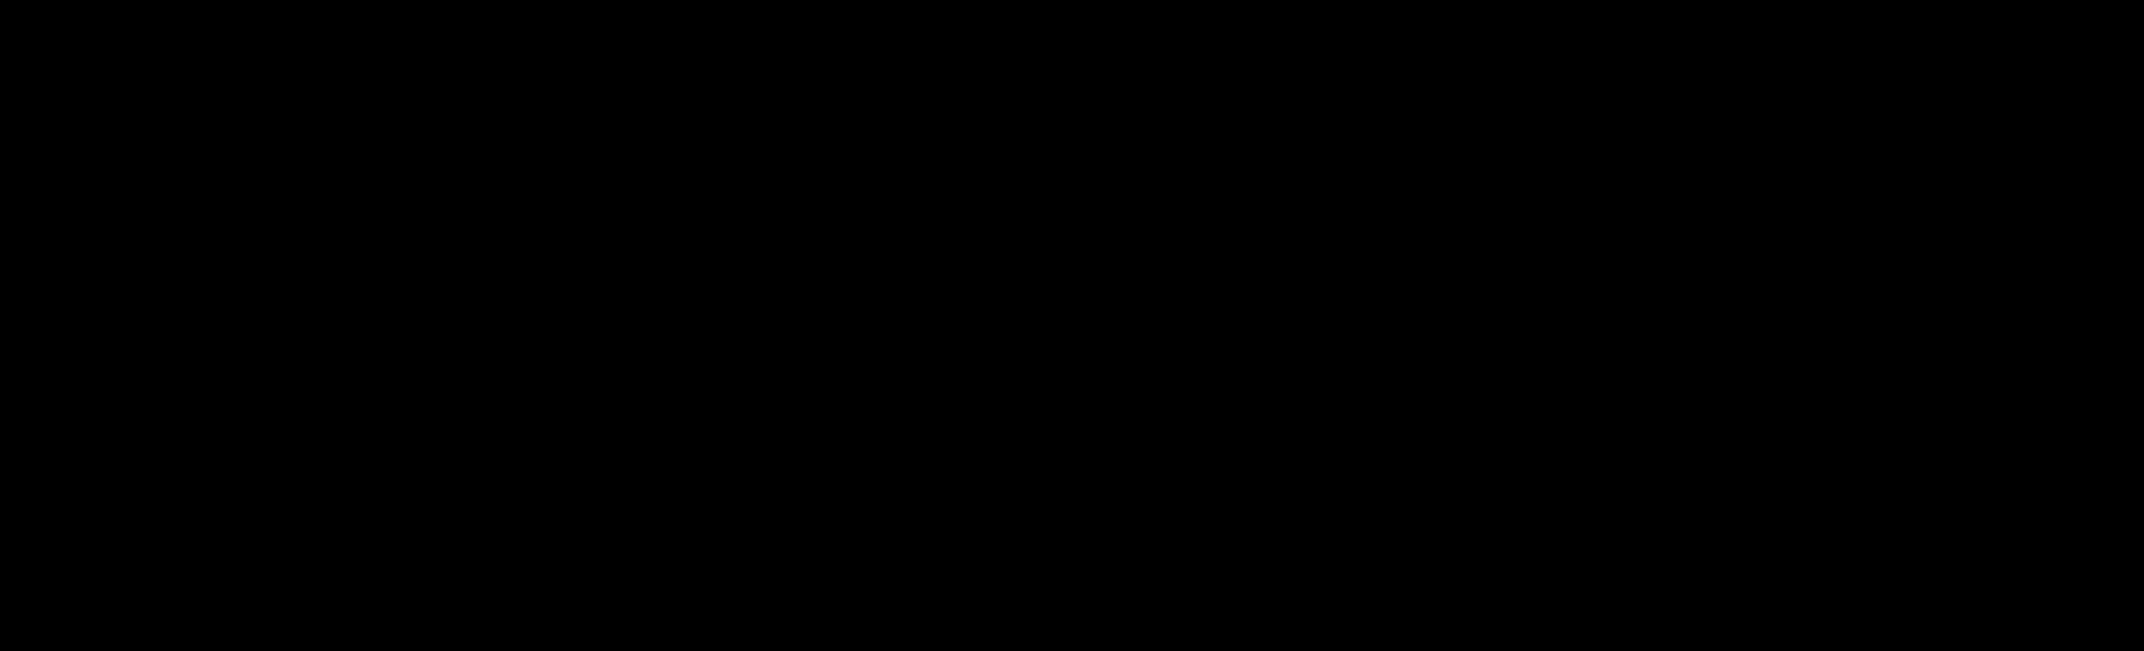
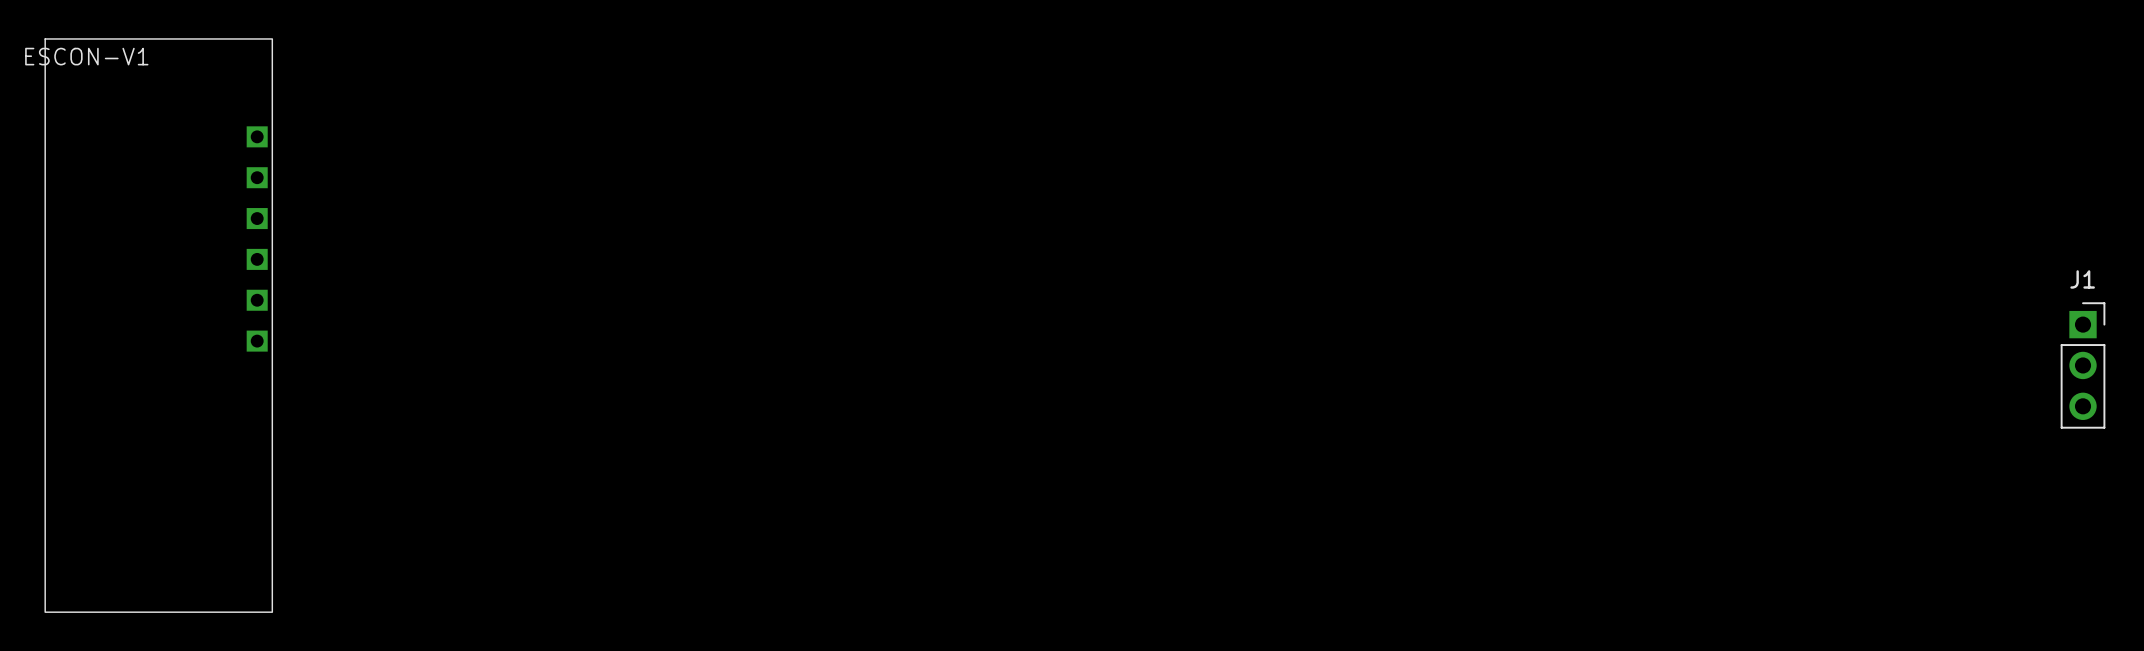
ESCON-V1: none -> (158, 325)
J1: none -> (2083, 365)

